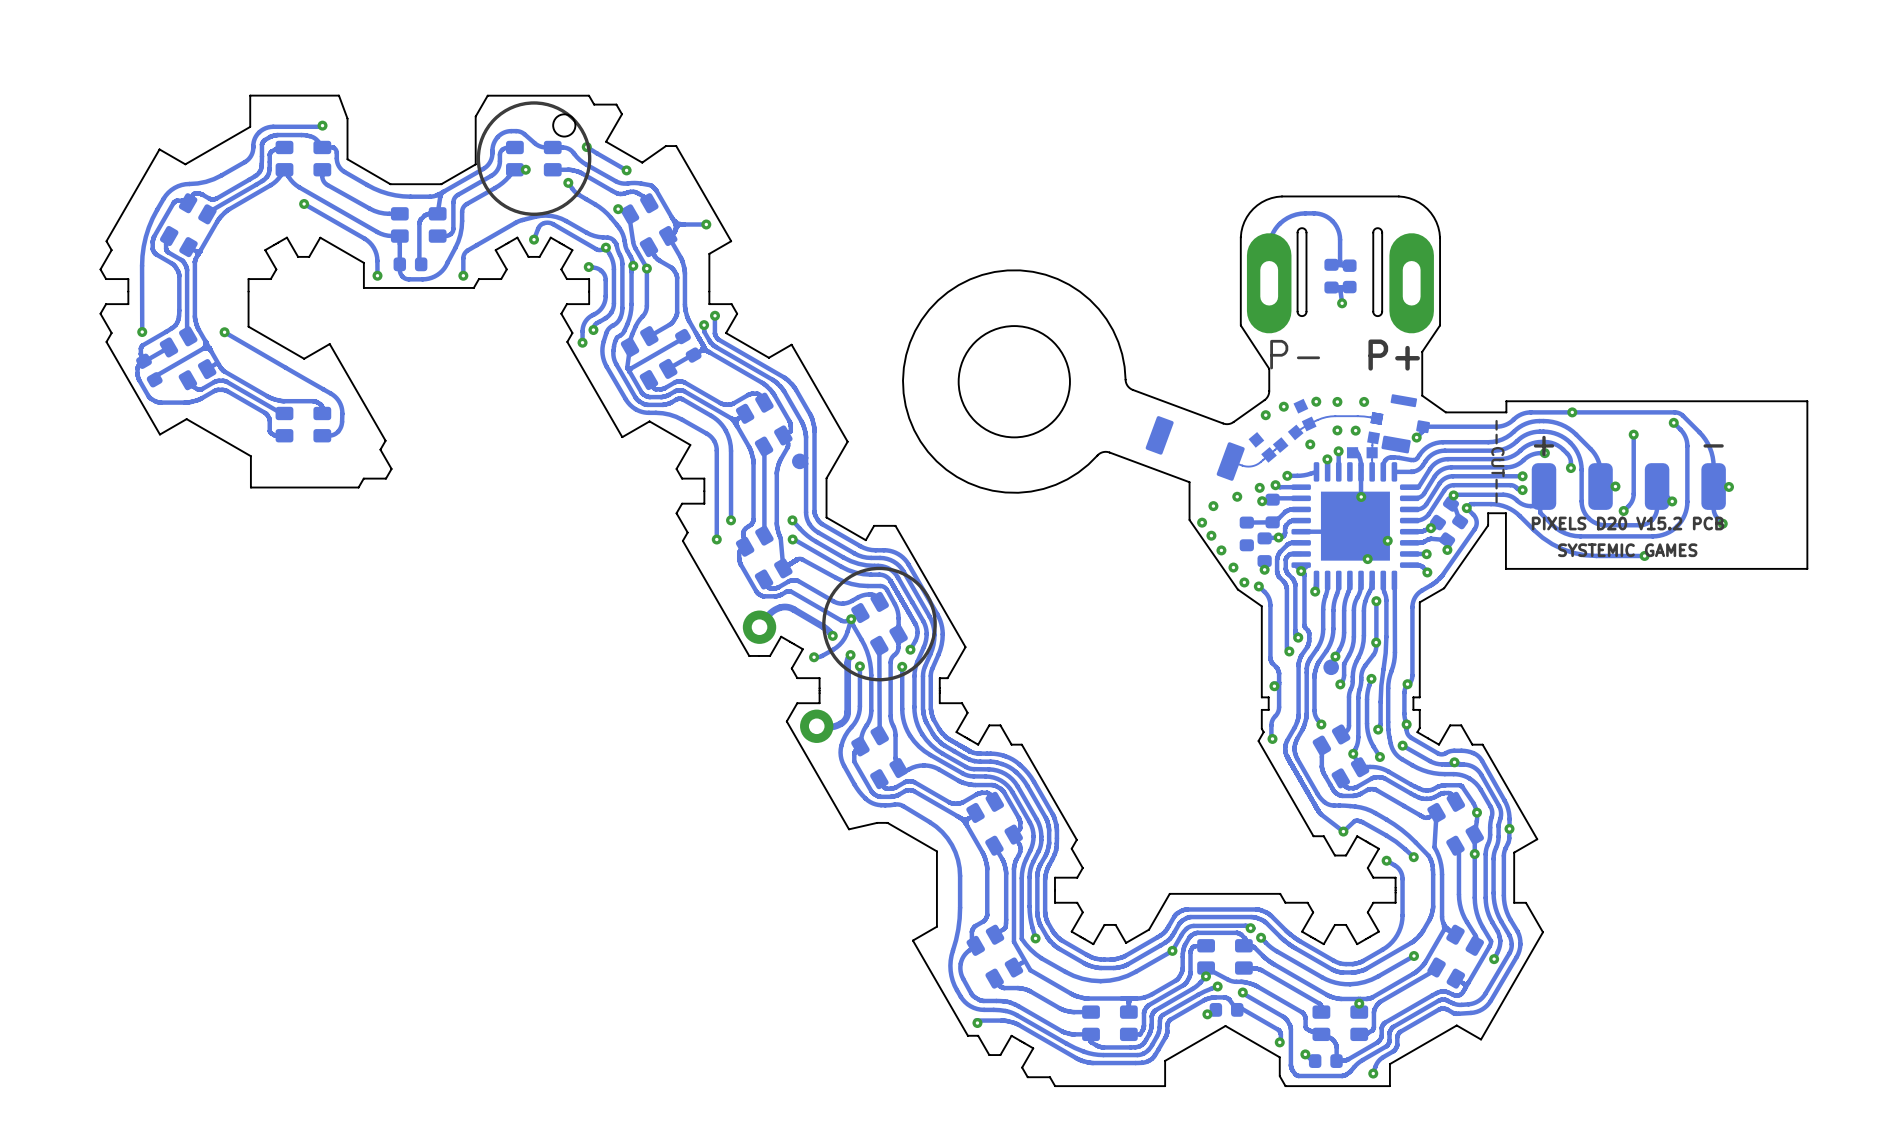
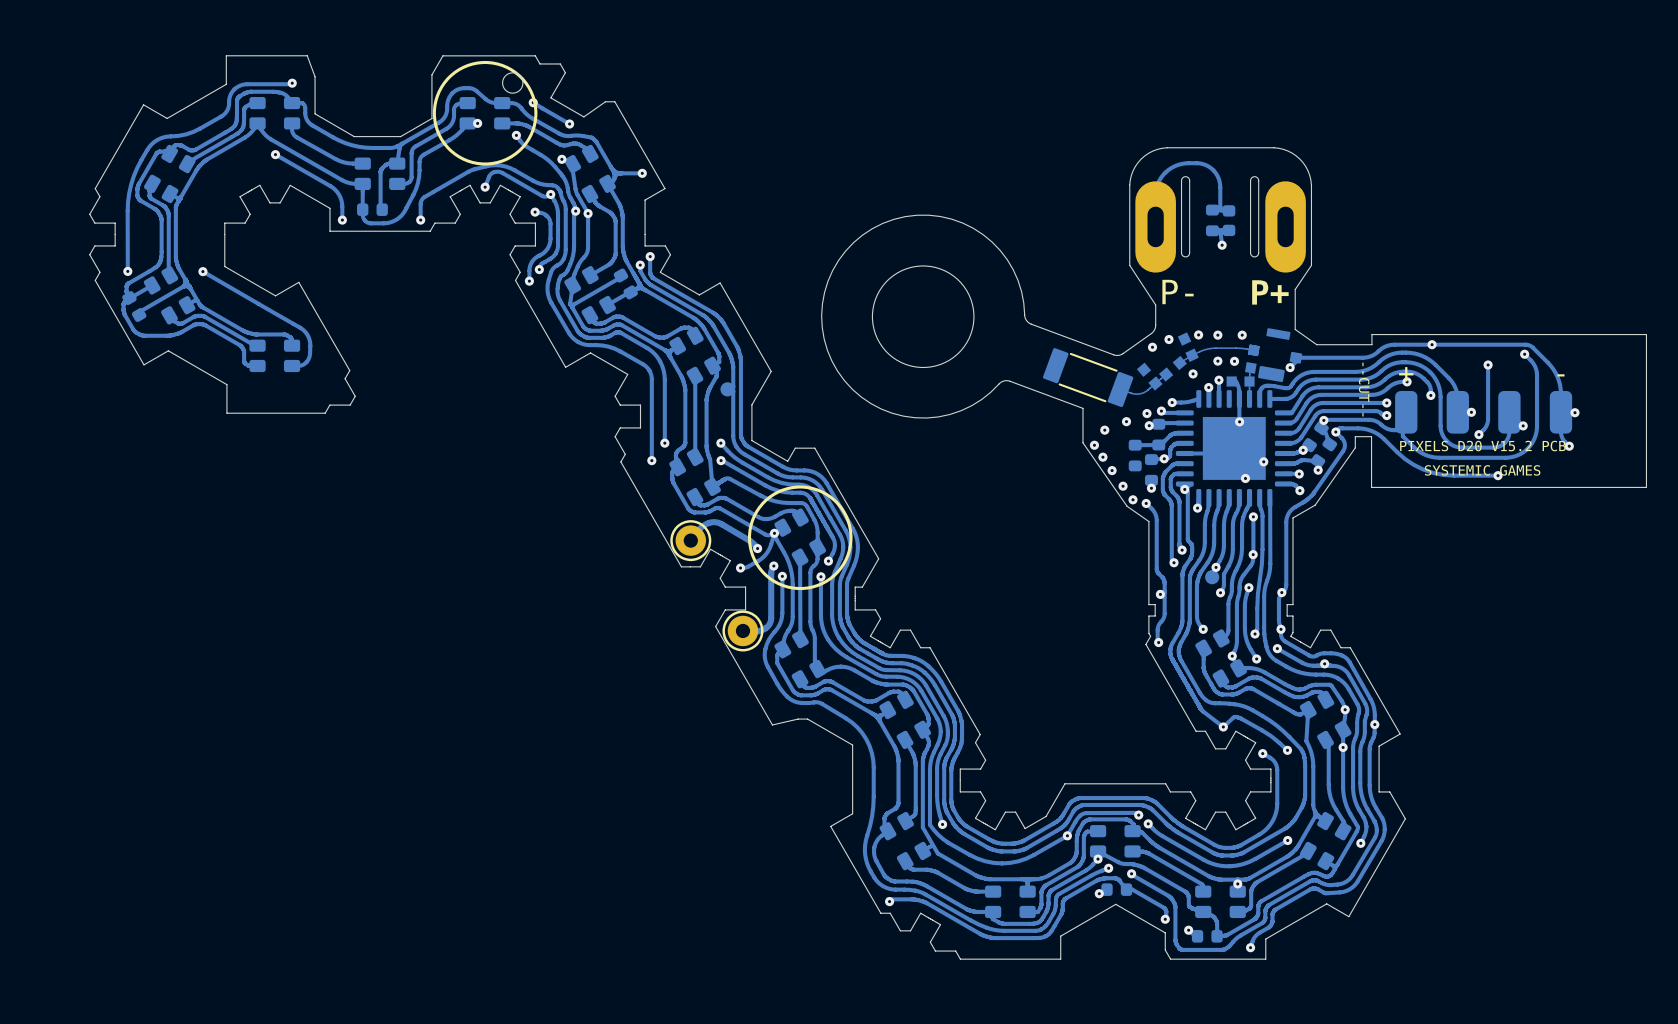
part footprint: [1145, 416, 1245, 481] -> [1042, 348, 1134, 408]
part footprint: [742, 610, 777, 644] -> [670, 520, 712, 562]
part footprint: [800, 709, 834, 743] -> [722, 610, 764, 652]

